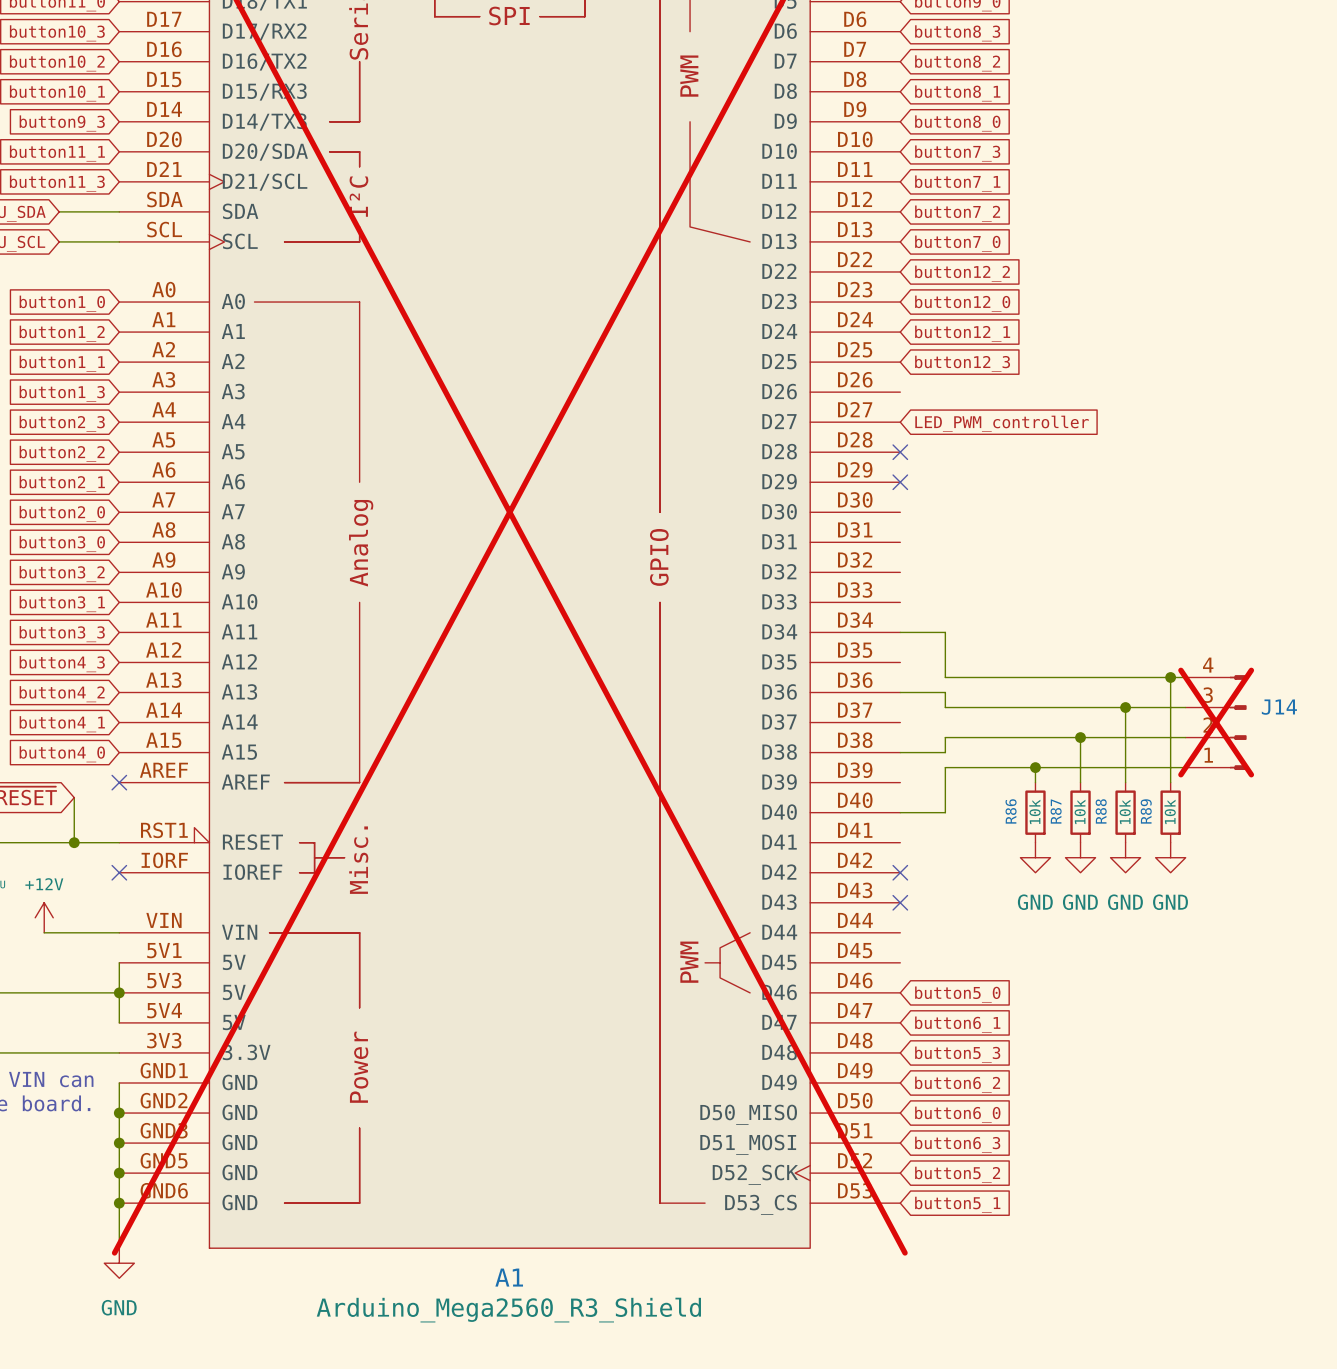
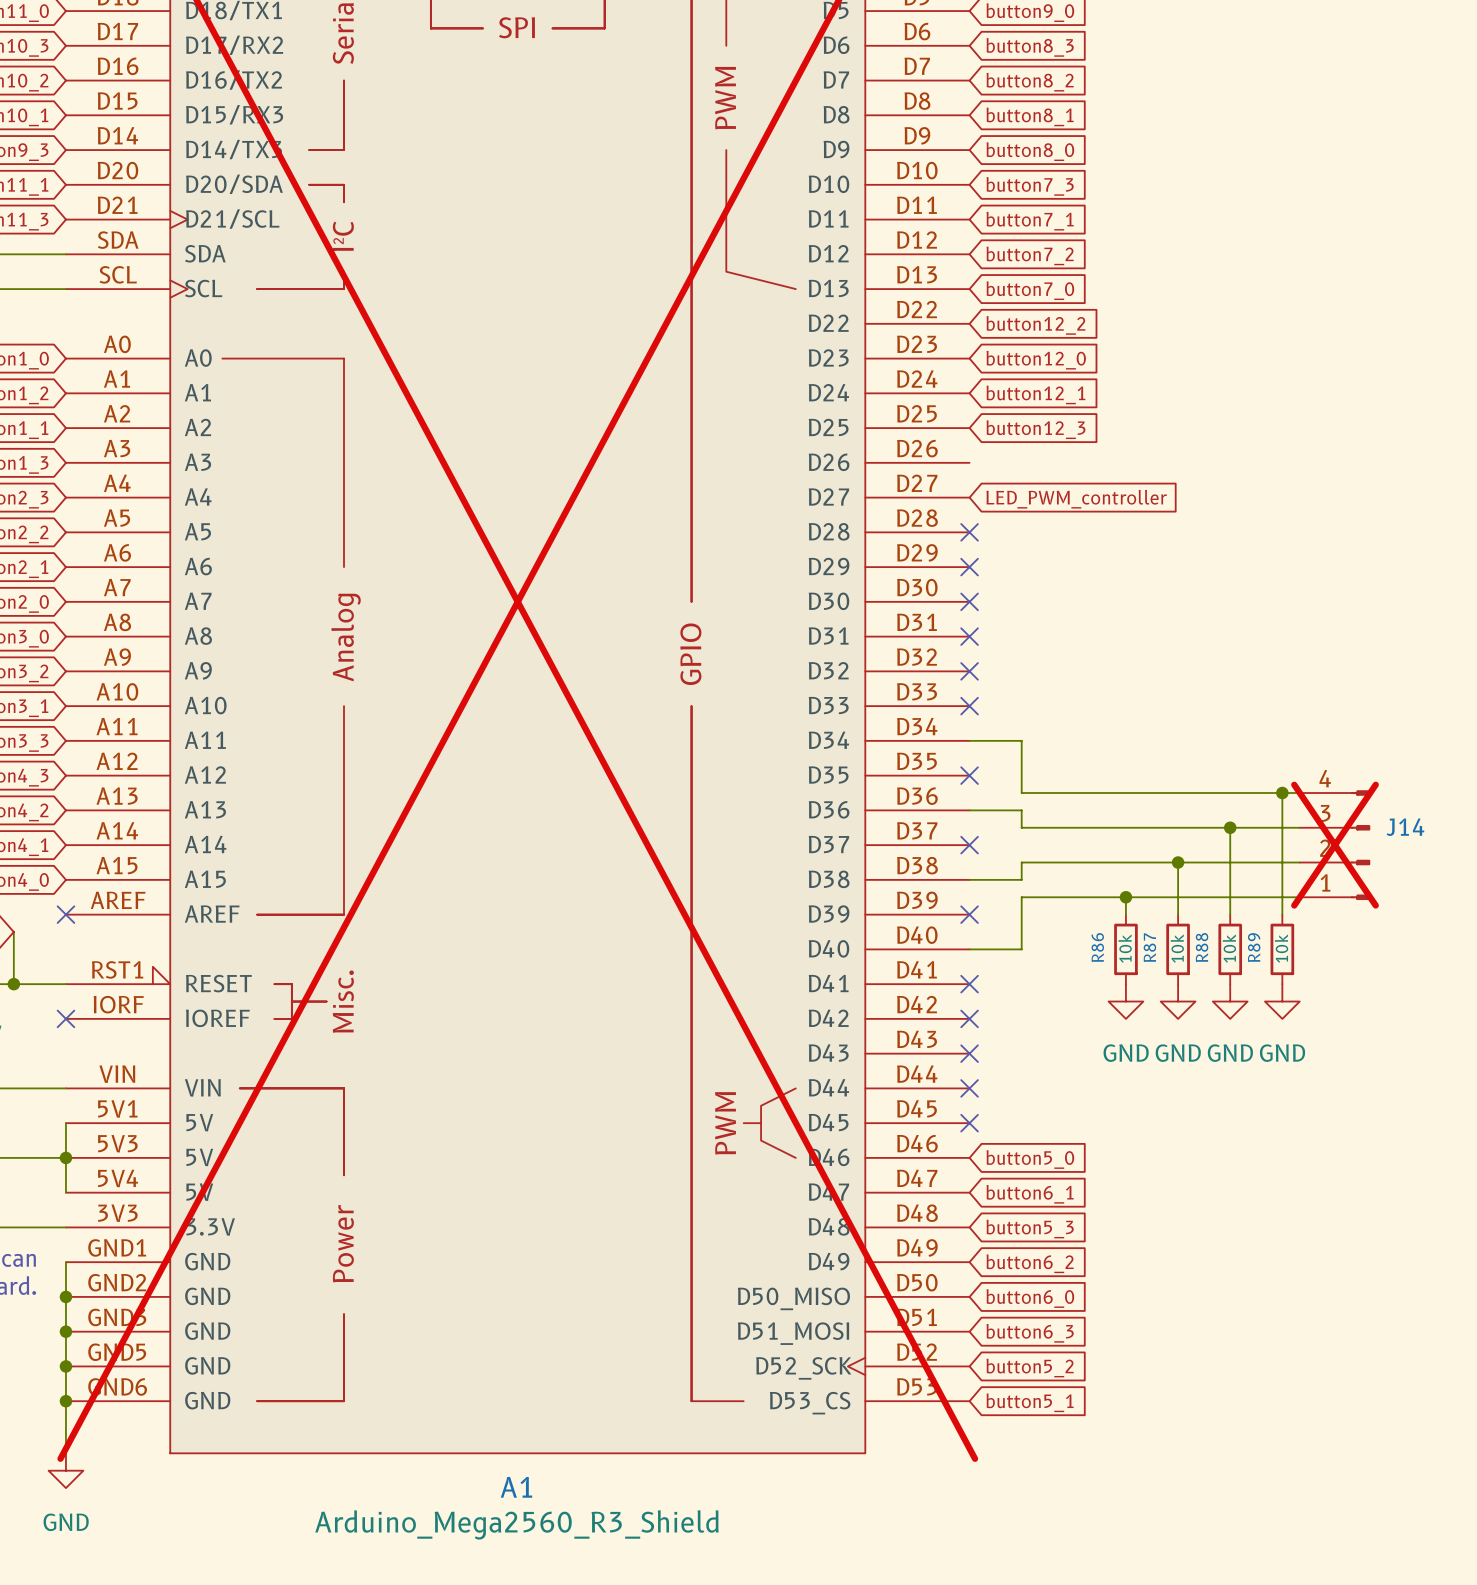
no-connect mark: none -> (969, 601)
no-connect mark: none -> (969, 636)
no-connect mark: none -> (969, 671)
no-connect mark: none -> (969, 706)
no-connect mark: none -> (969, 775)
no-connect mark: none -> (969, 845)
no-connect mark: none -> (969, 914)
no-connect mark: none -> (969, 984)
no-connect mark: none -> (969, 1088)
no-connect mark: none -> (969, 1123)

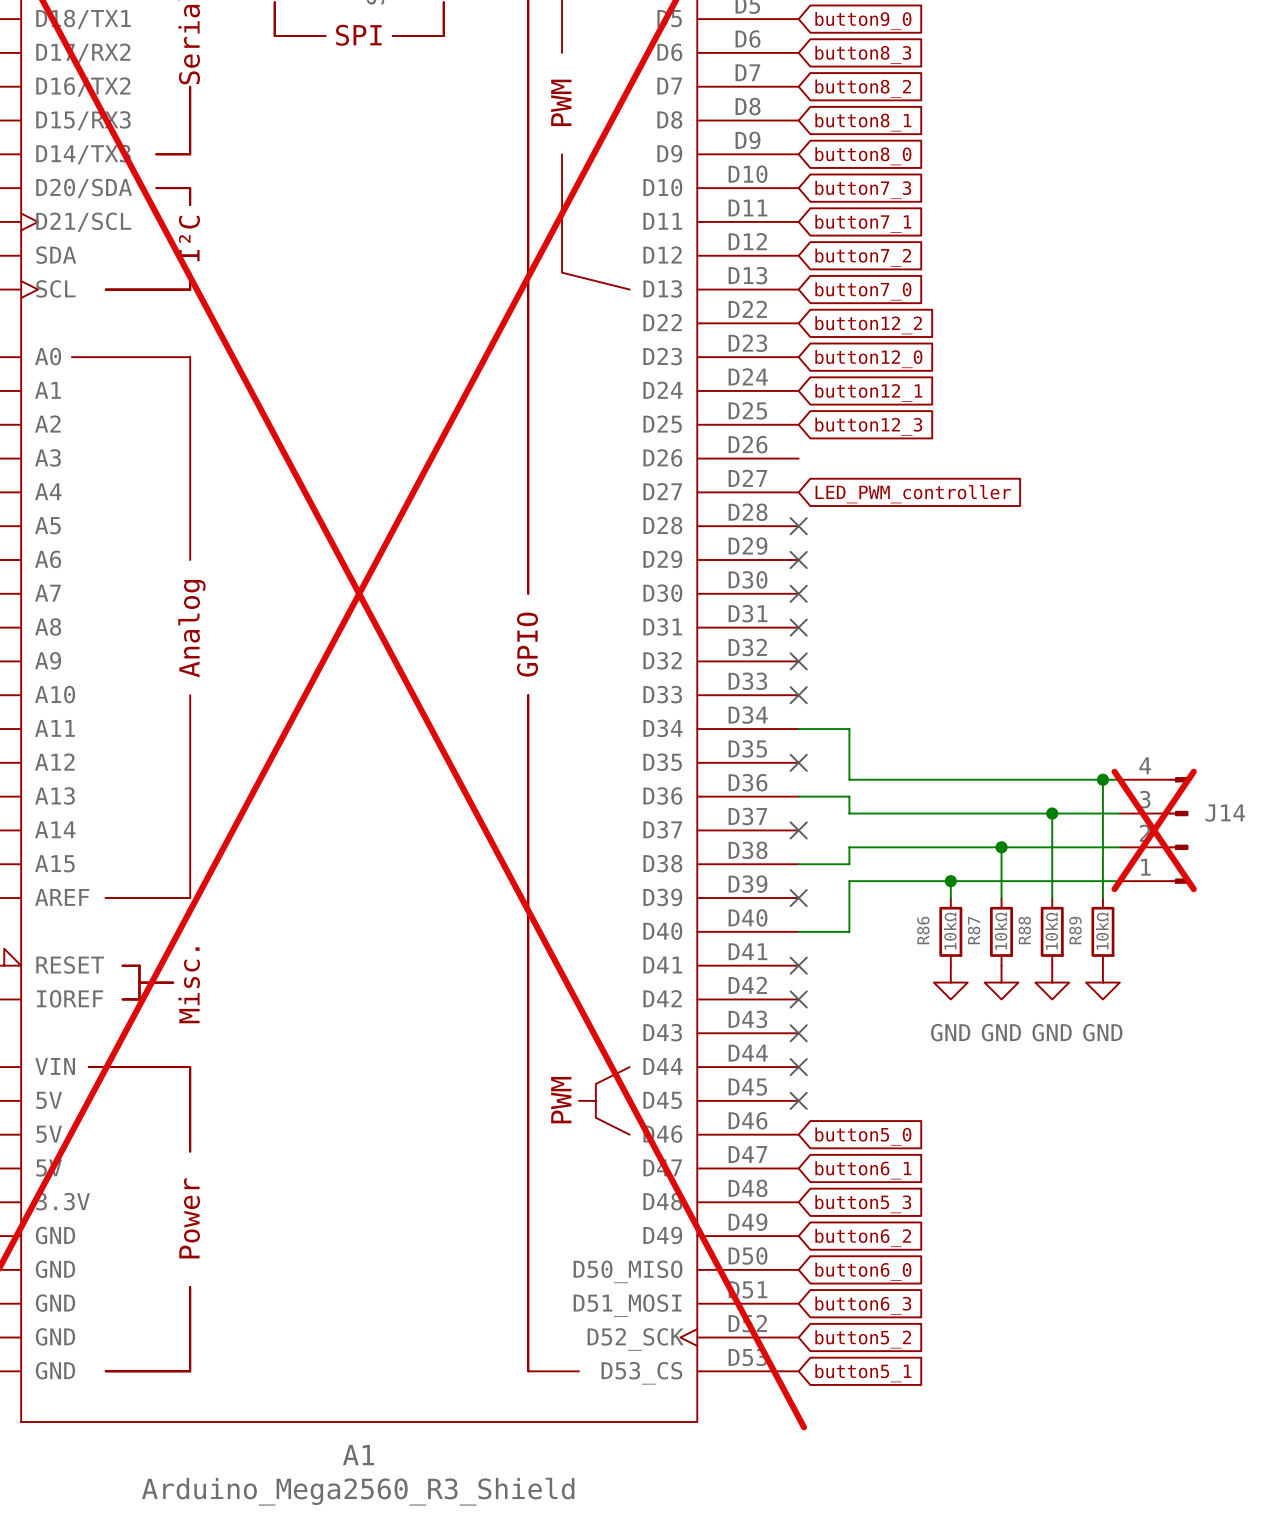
R86 value: 10k (1125, 948) -> 10kΩ (950, 931)
R87 value: 10k (1177, 948) -> 10kΩ (1000, 931)
R88 value: 10k (1229, 948) -> 10kΩ (1051, 931)
R89 value: 10k (1281, 948) -> 10kΩ (1102, 931)

